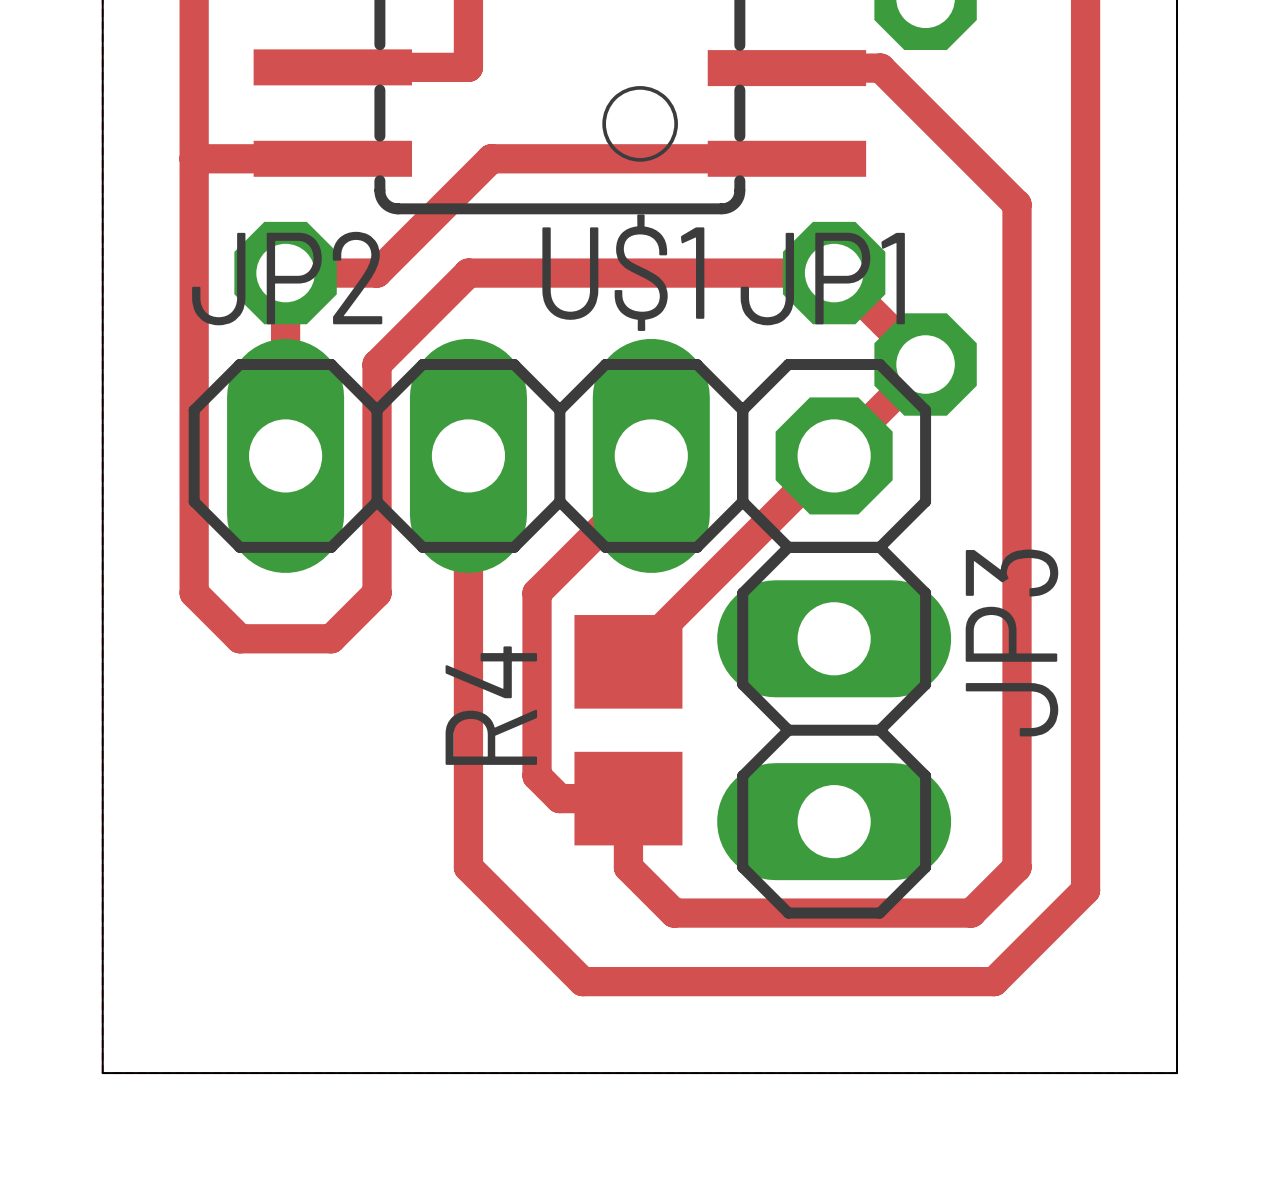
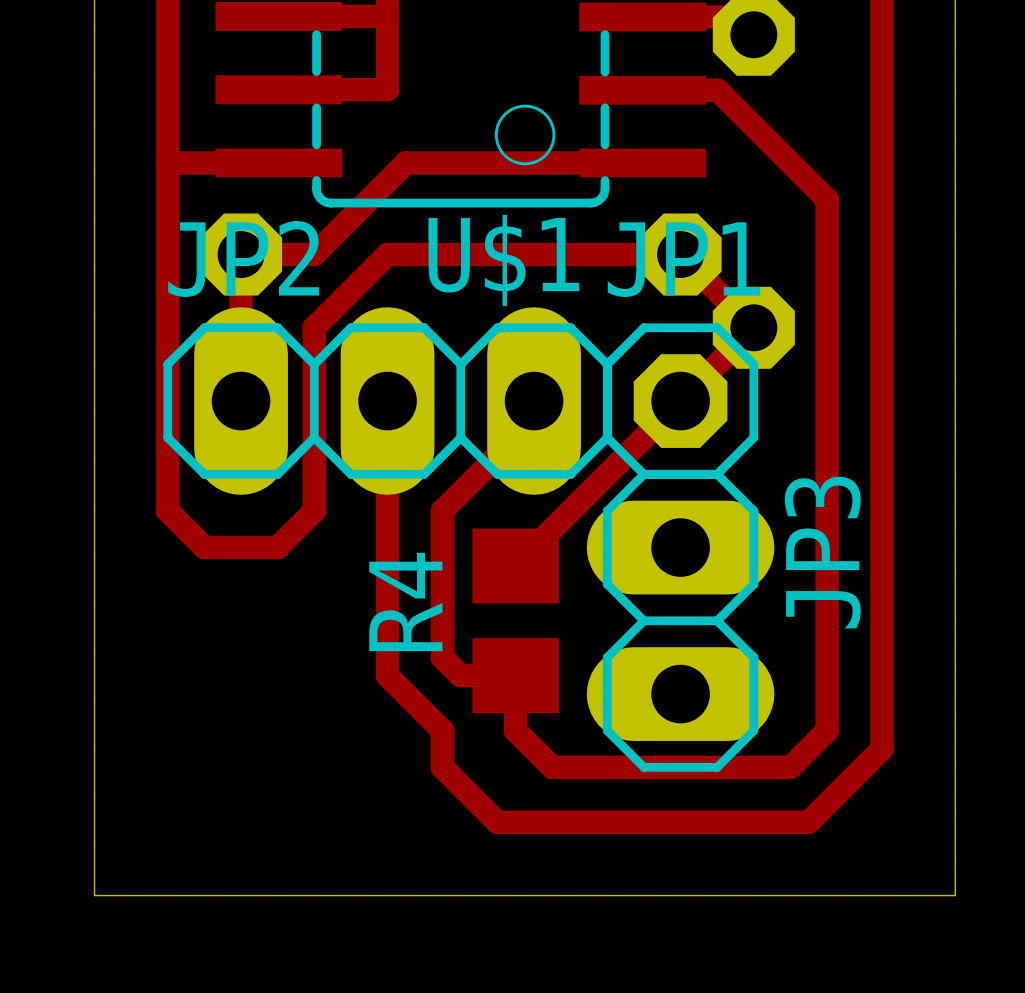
top track: (468, 798) (468, 867) (582, 981) (605, 981) -> (387, 675) (442, 730) (442, 767) (497, 822)

